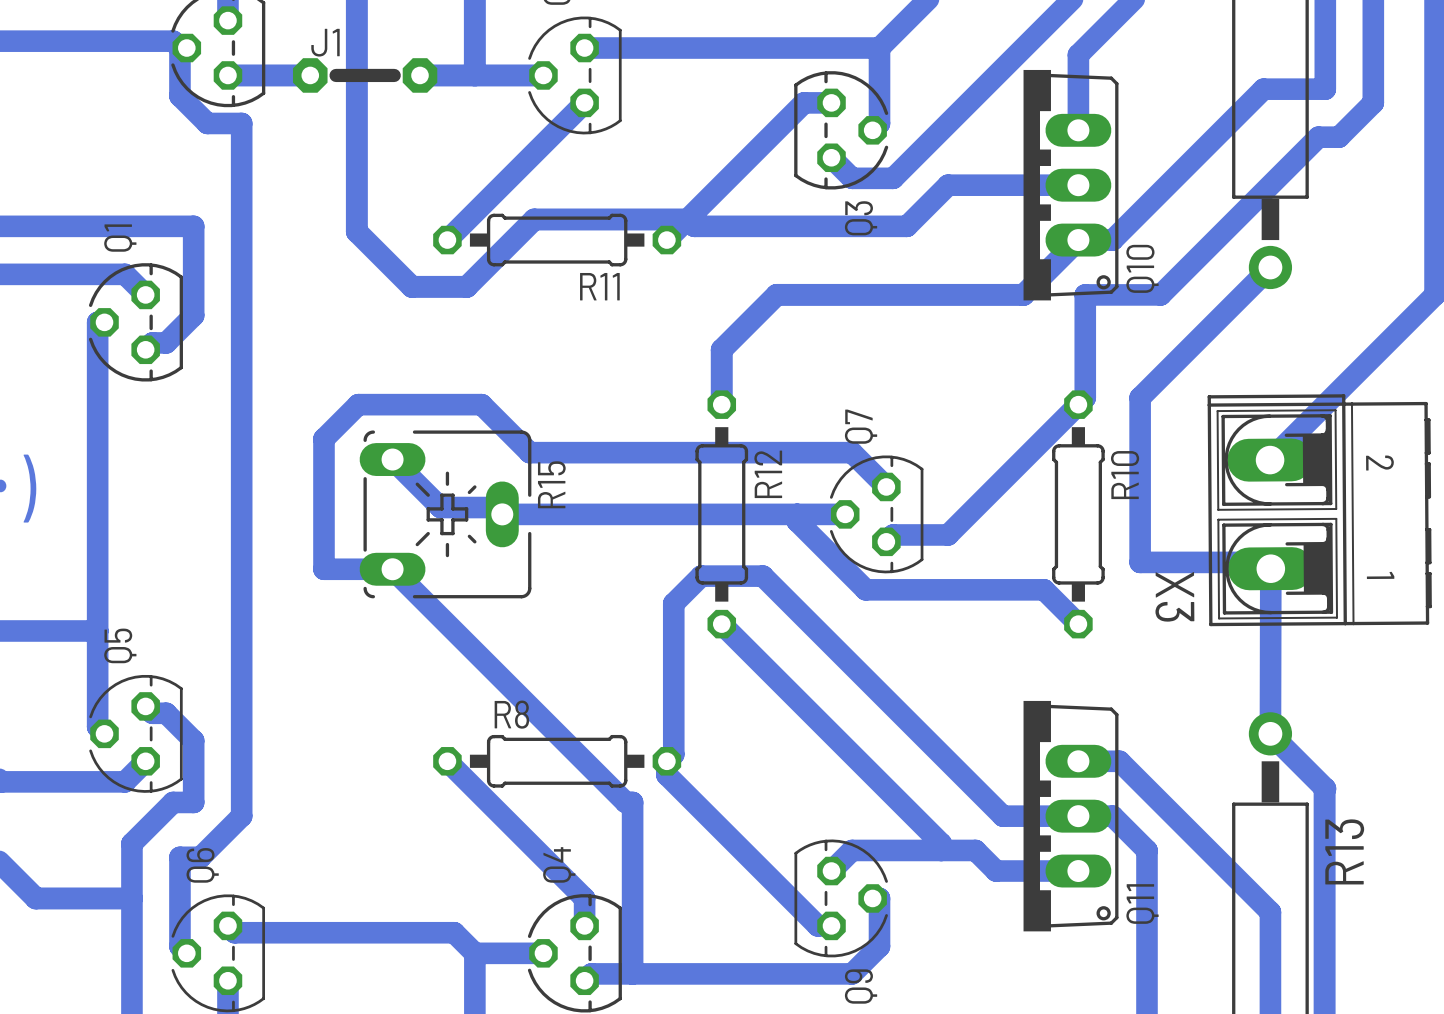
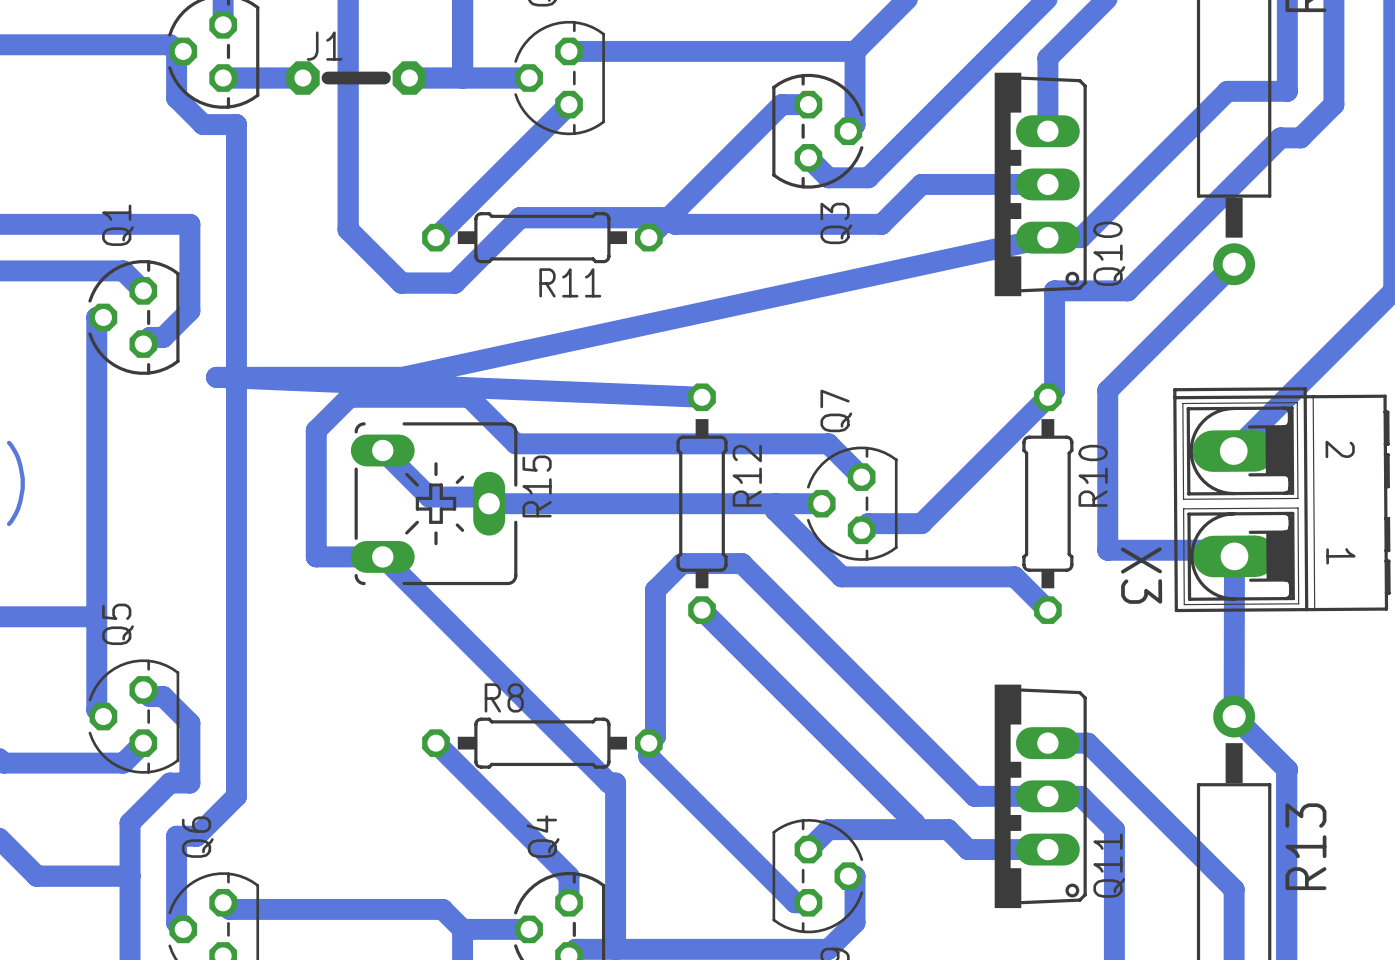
bottom track: (1078, 240) (1023, 294) (776, 294) (721, 349) (721, 404) -> (1047, 237) (402, 377) (216, 377) (702, 397)

